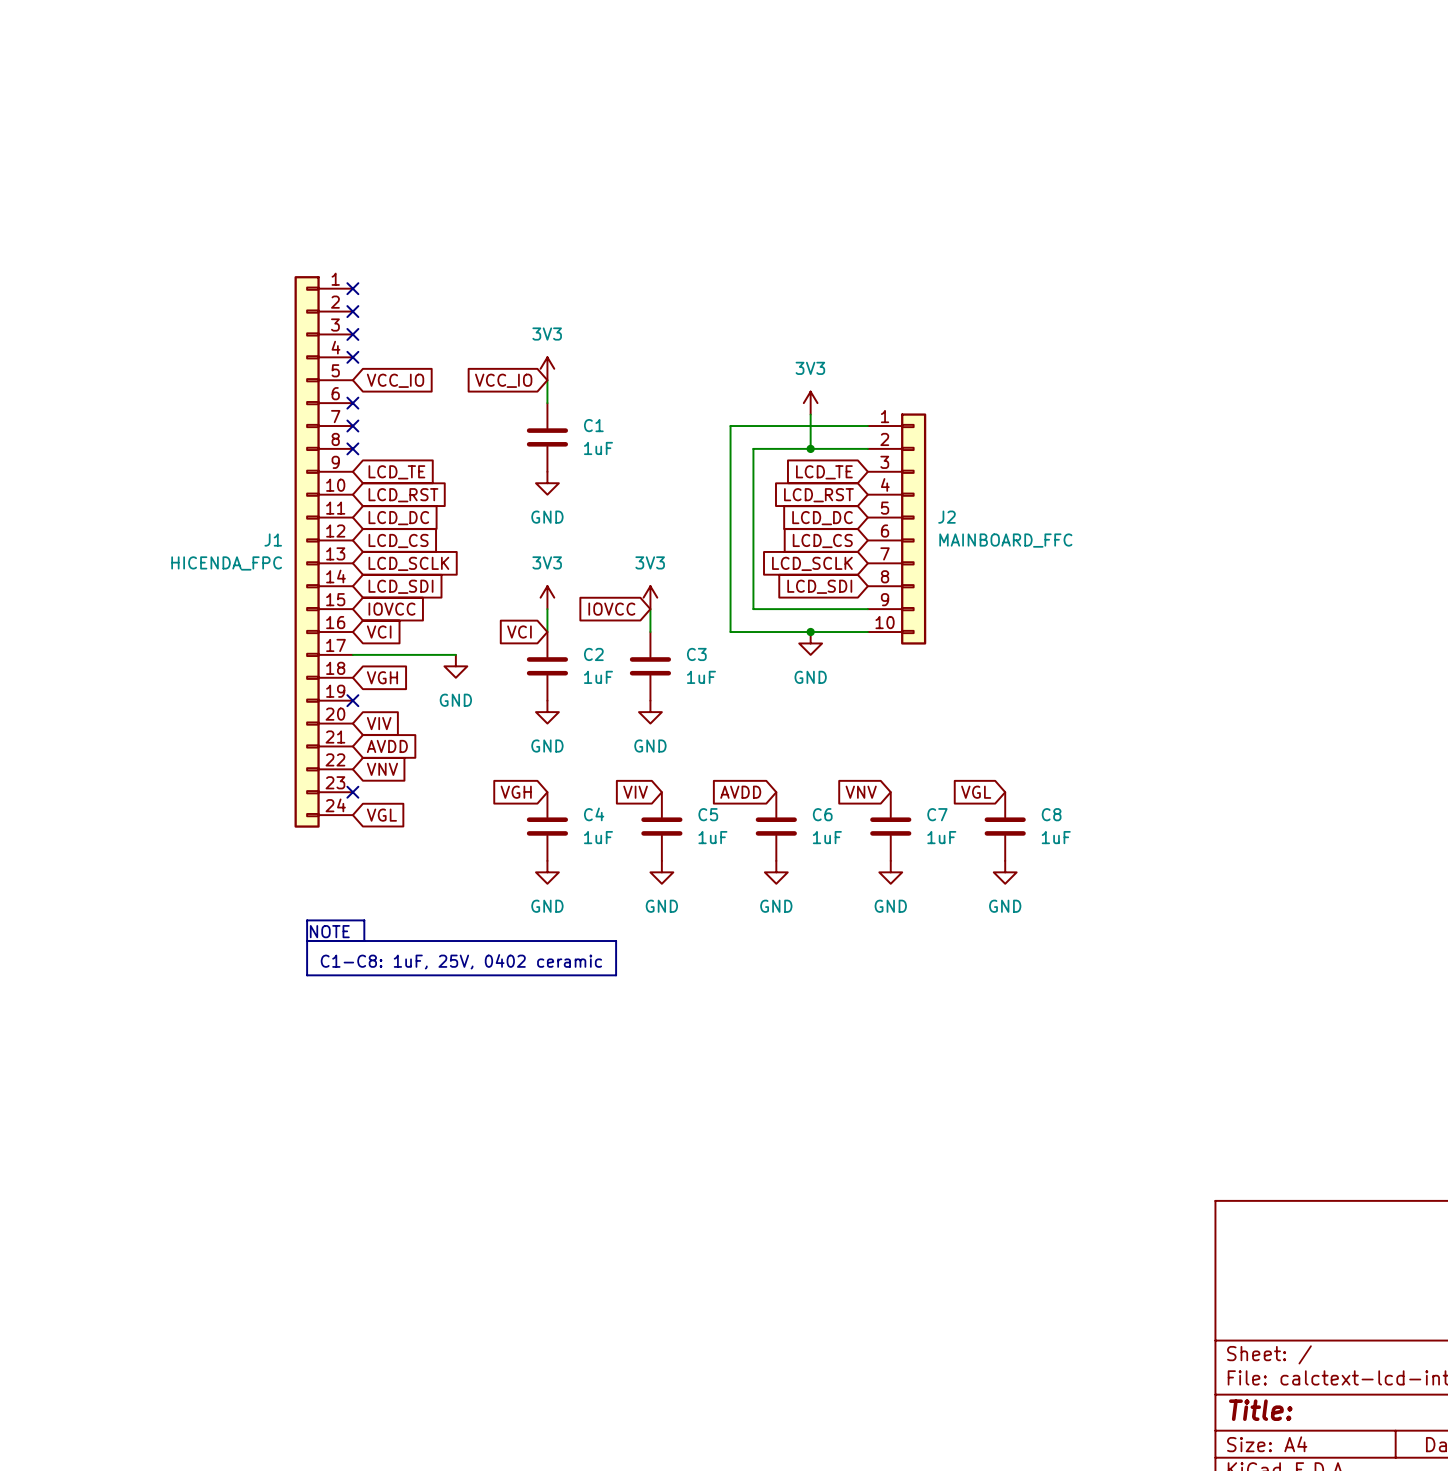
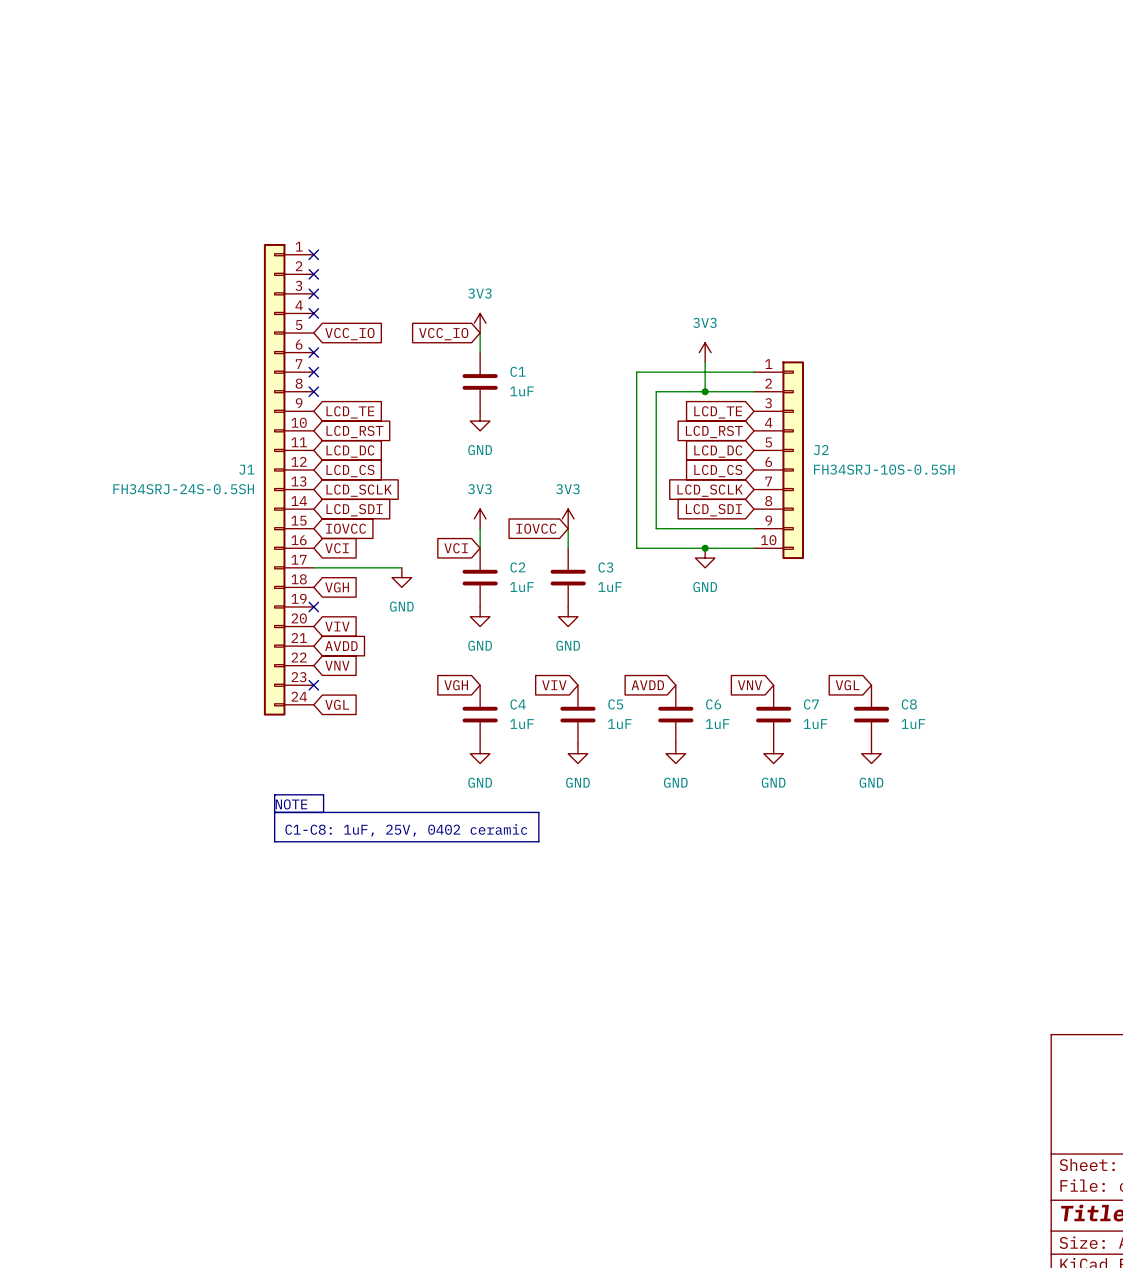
J2 value: MAINBOARD_FFC (1005, 540) -> FH34SRJ-10S-0.5SH (884, 469)
J1 value: HICENDA_FPC (226, 563) -> FH34SRJ-24S-0.5SH (183, 489)

